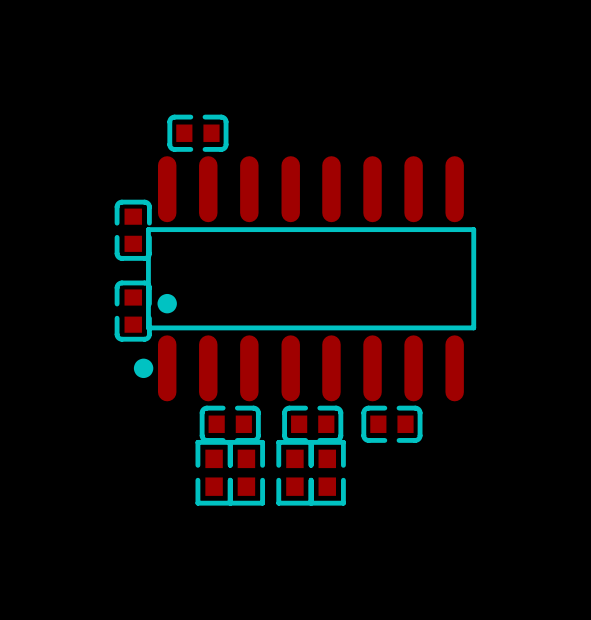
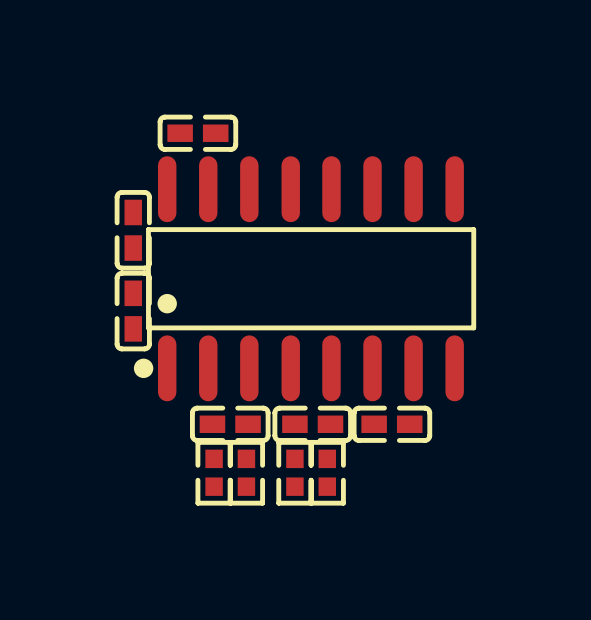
part footprint: [167, 114, 229, 152] -> [157, 114, 239, 152]
part footprint: [114, 199, 152, 261] -> [114, 190, 152, 271]
part footprint: [114, 280, 152, 342] -> [114, 270, 152, 352]
part footprint: [199, 405, 261, 443] -> [190, 405, 271, 443]
part footprint: [282, 405, 344, 443] -> [272, 405, 353, 443]
part footprint: [361, 405, 423, 443] -> [351, 405, 433, 443]

